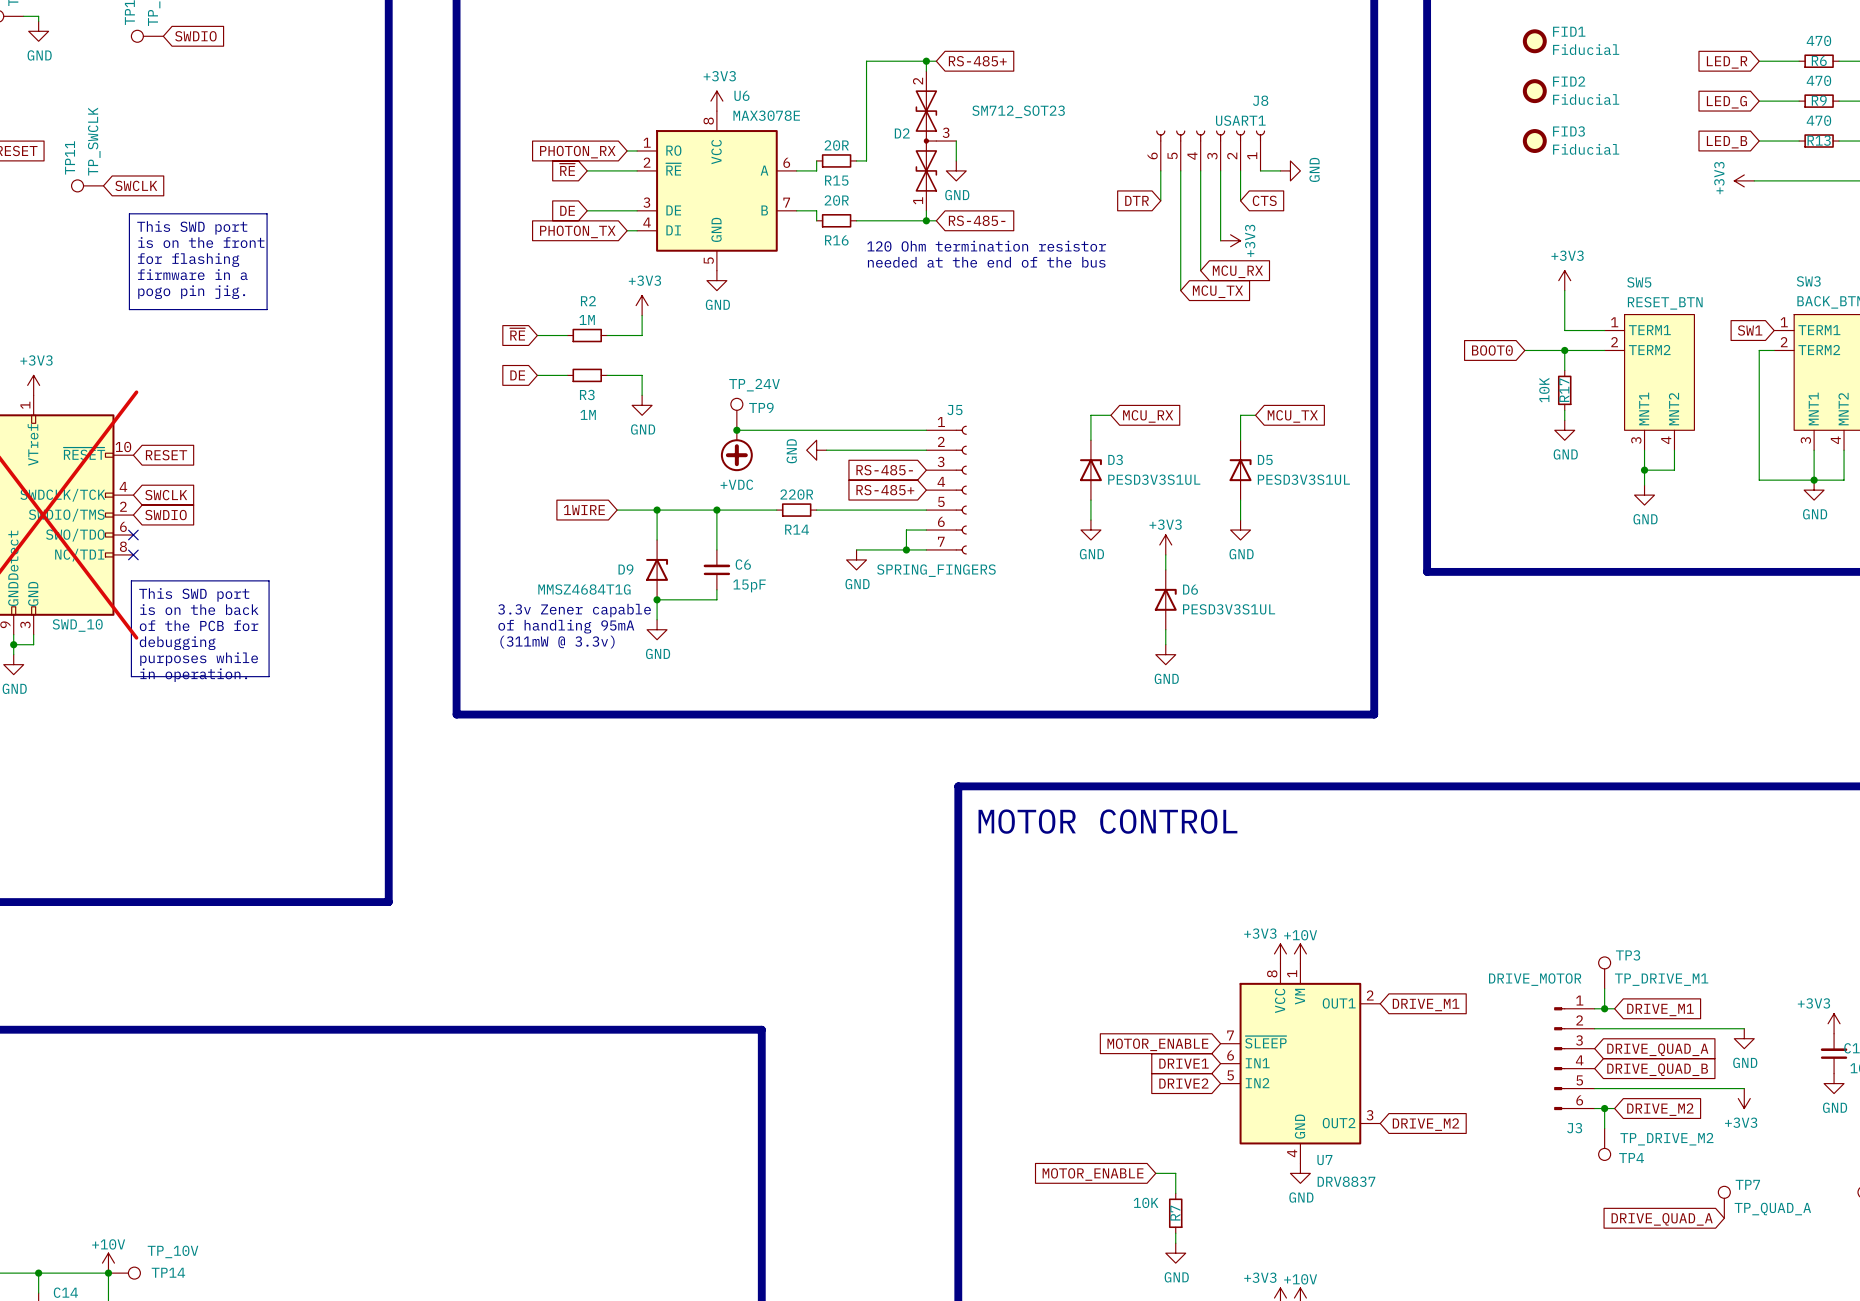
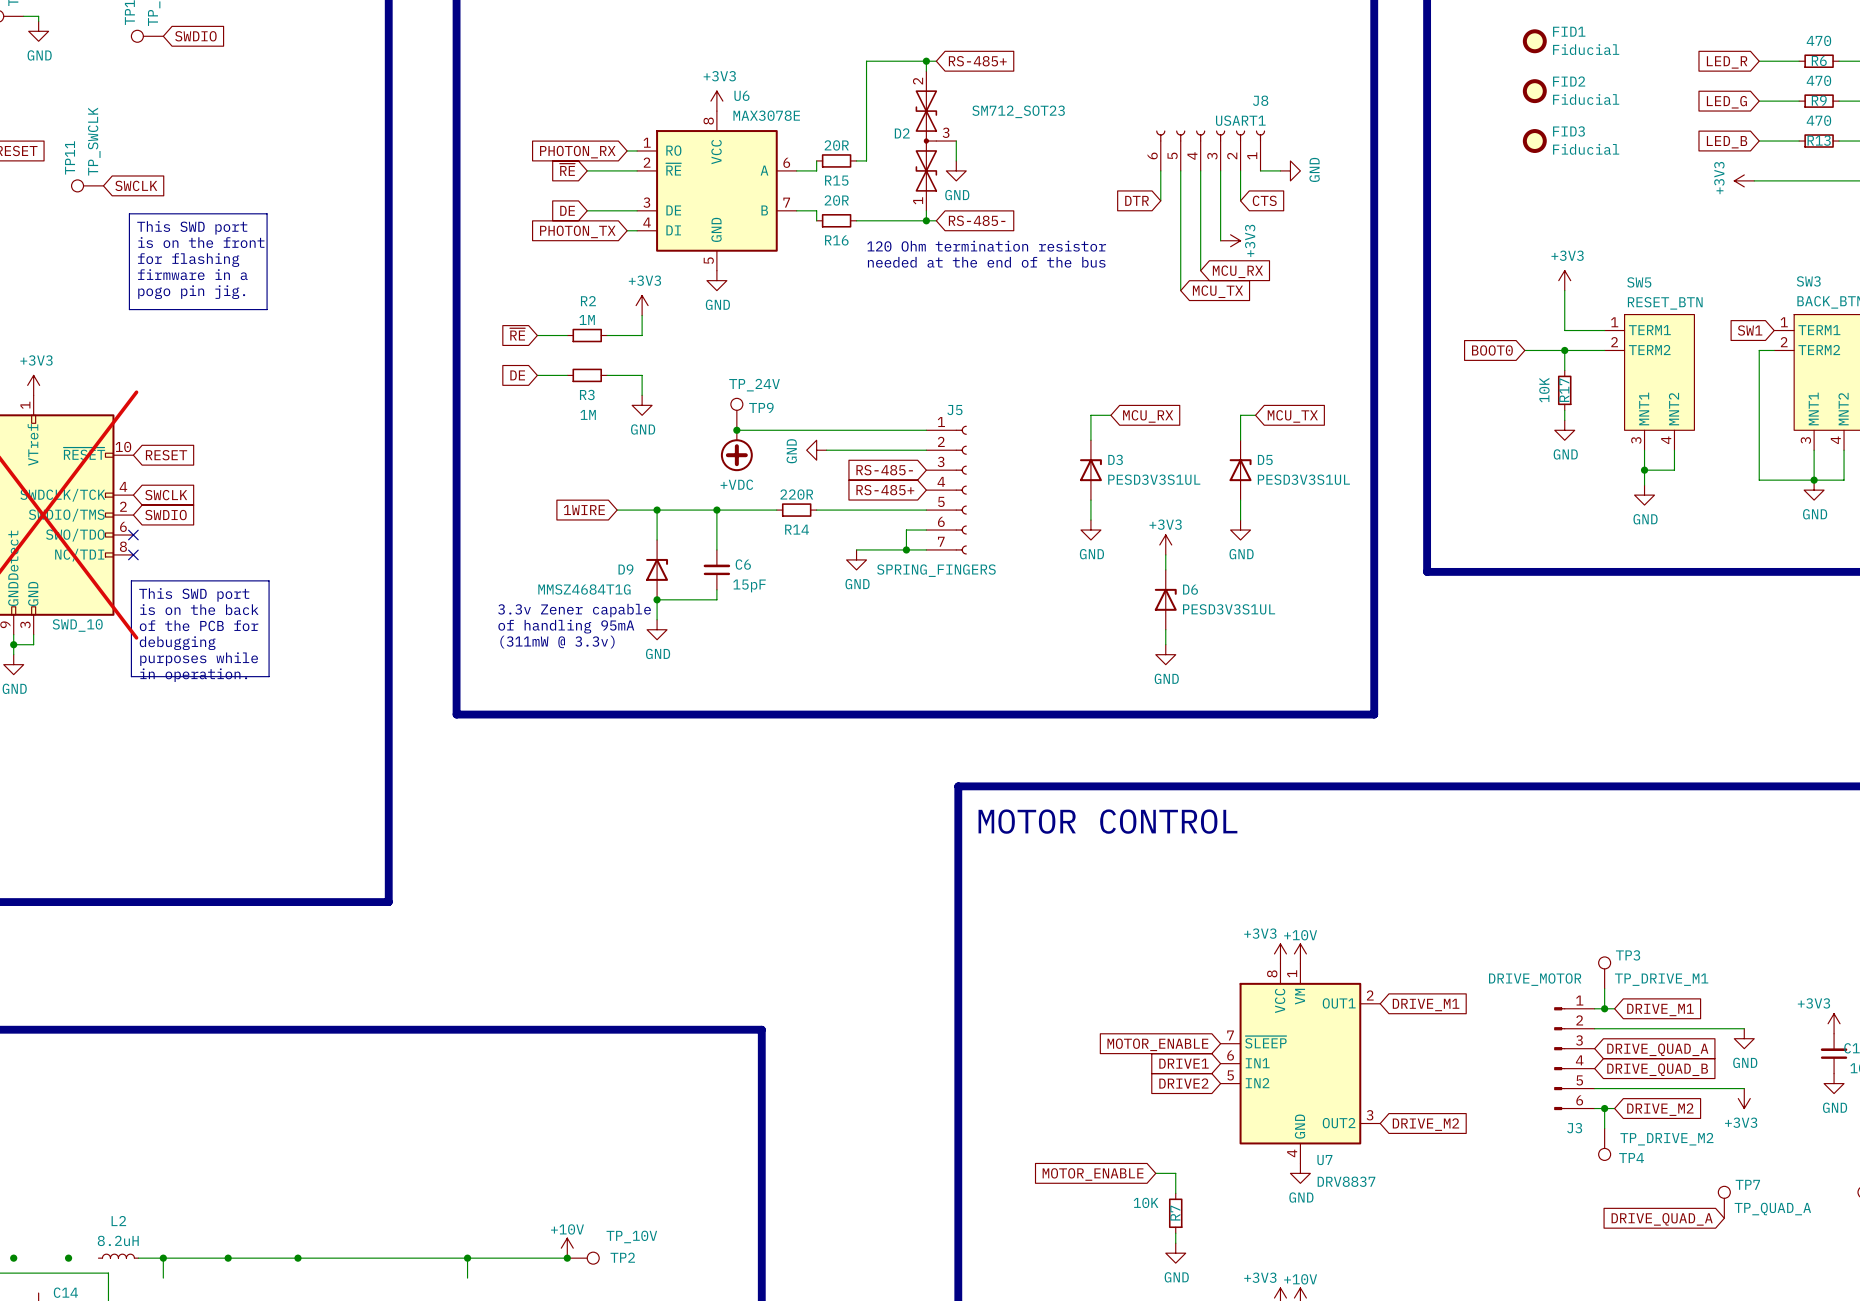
power symbol: none -> +10V (567, 1248)
L2: none -> 8.2uH (118, 1256)
junction: none -> (13, 1258)
junction: none -> (68, 1258)
wire: none -> (138, 1258) (567, 1258)
junction: none -> (163, 1258)
junction: none -> (228, 1258)
junction: none -> (297, 1258)
wire: none -> (467, 1258) (467, 1278)
junction: none -> (467, 1258)
junction: none -> (567, 1258)
TP2: none -> TP_10V (583, 1258)
power symbol: +10V (108, 1263) -> none
wire: (38, 1273) (38, 1293) -> (163, 1258) (163, 1278)
junction: (38, 1273) -> none
junction: (108, 1273) -> none
TP14: TP_10V (124, 1273) -> none

